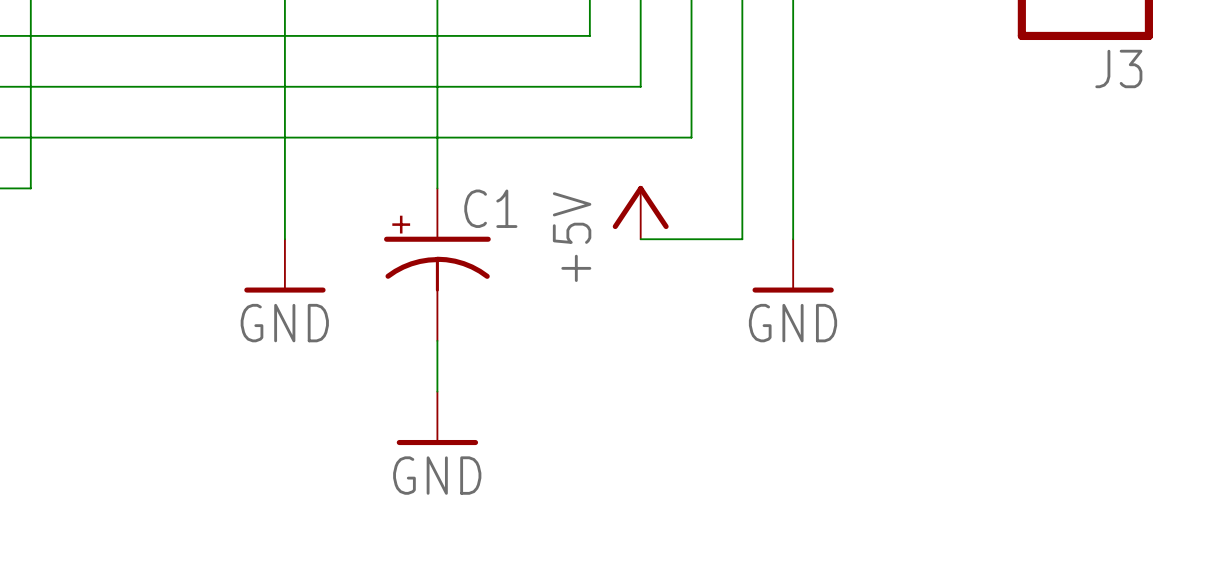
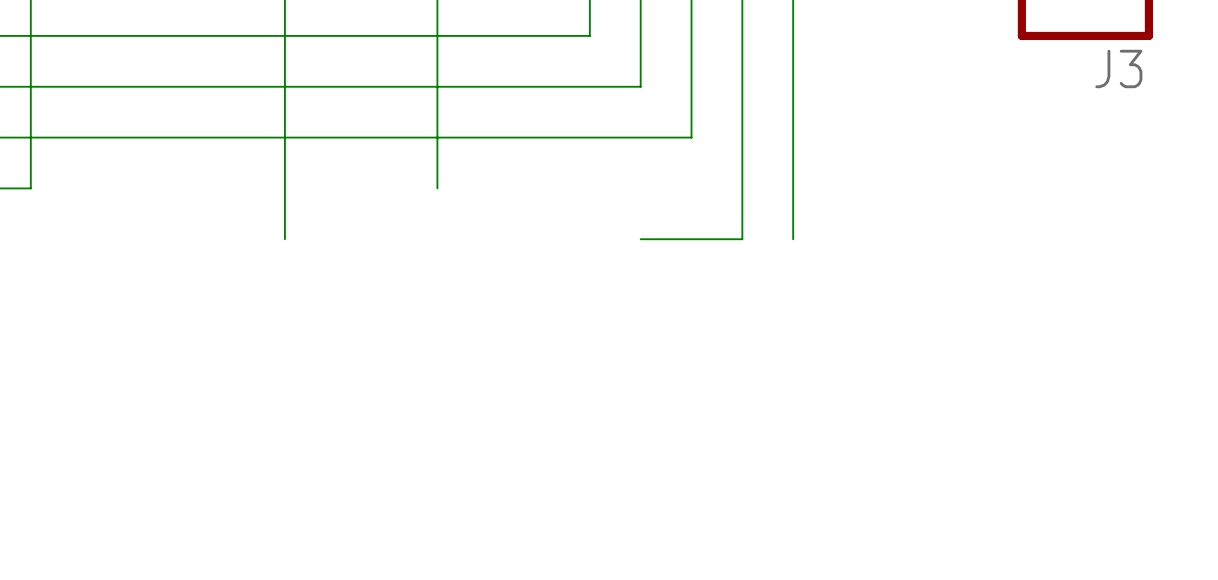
power symbol: +5V (640, 212) -> none
C1: (437, 264) -> none
power symbol: GND (284, 265) -> none
power symbol: GND (793, 265) -> none
wire: (437, 340) (437, 391) -> none
power symbol: GND (437, 418) -> none

